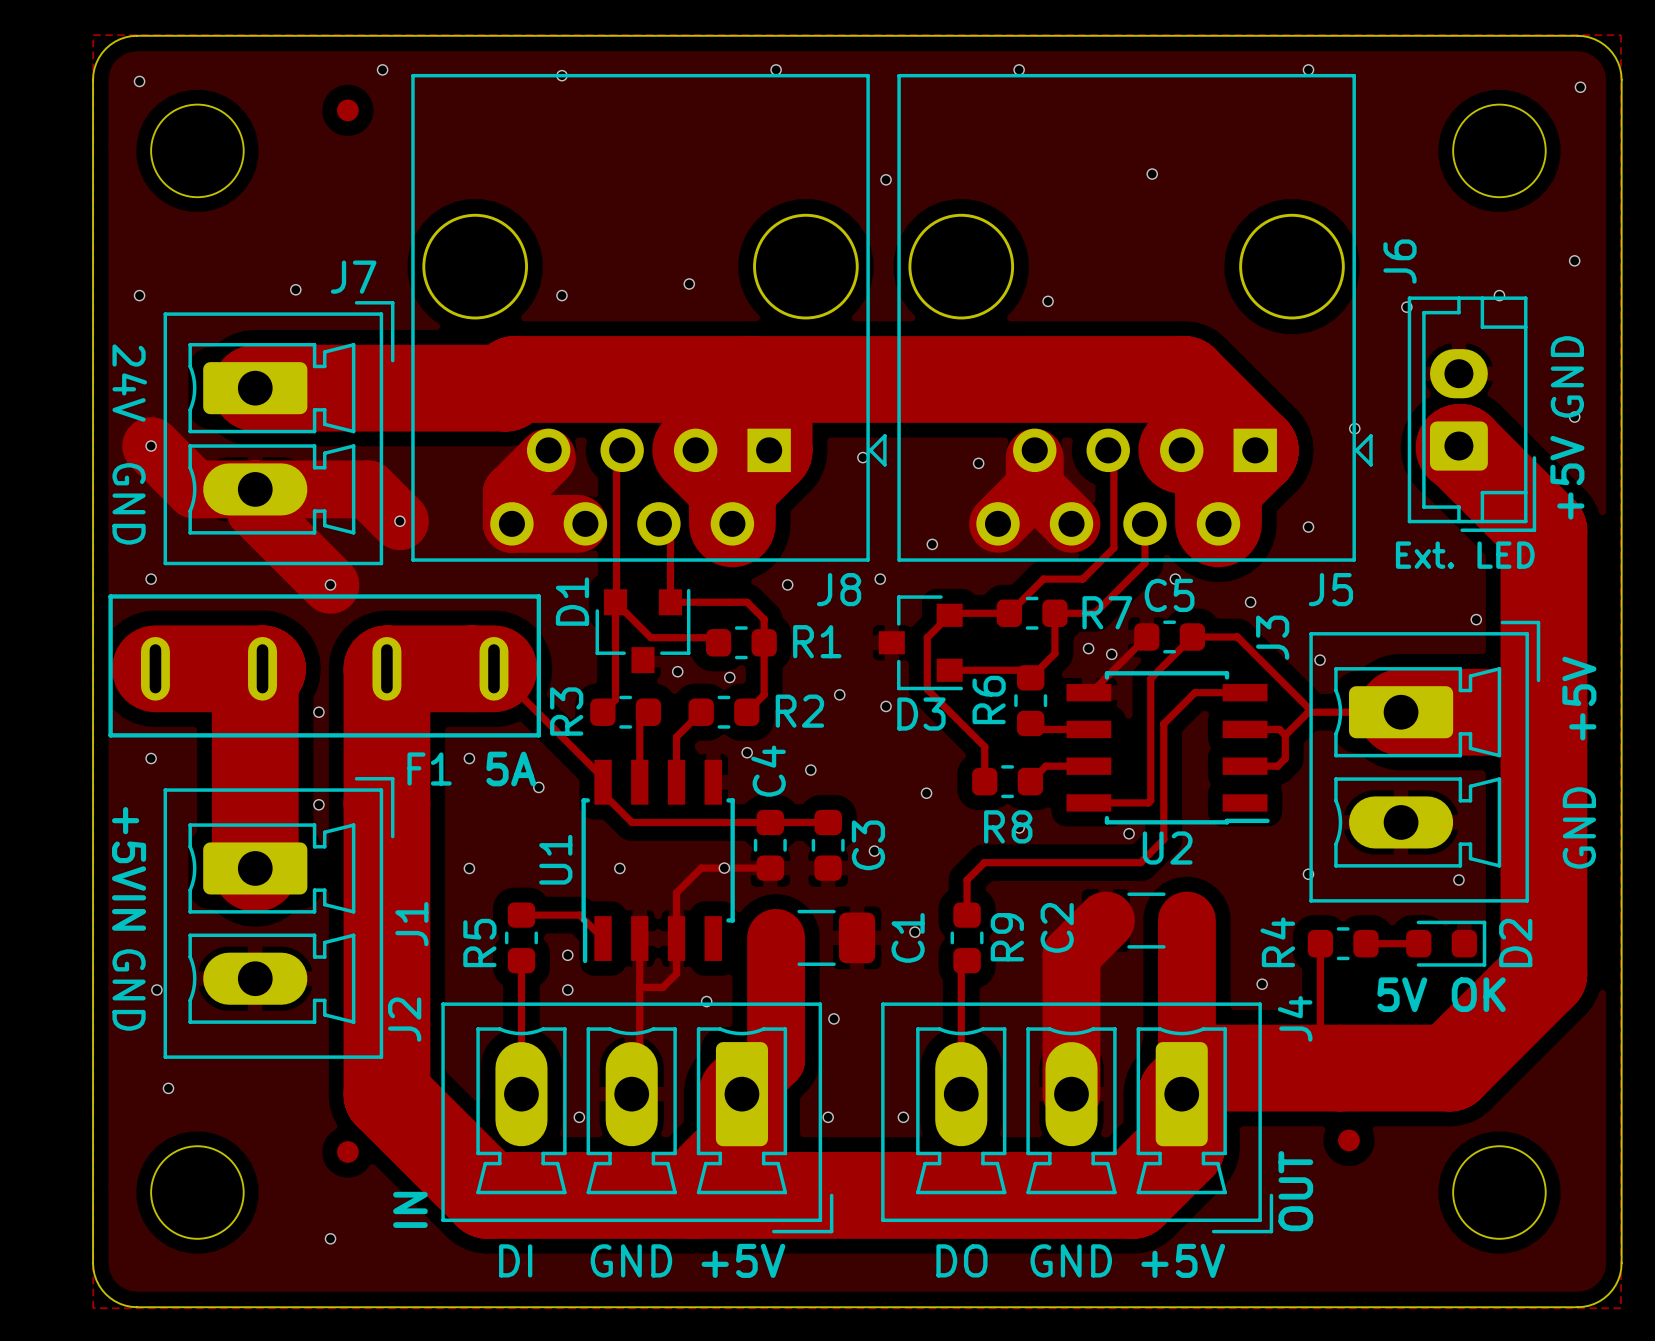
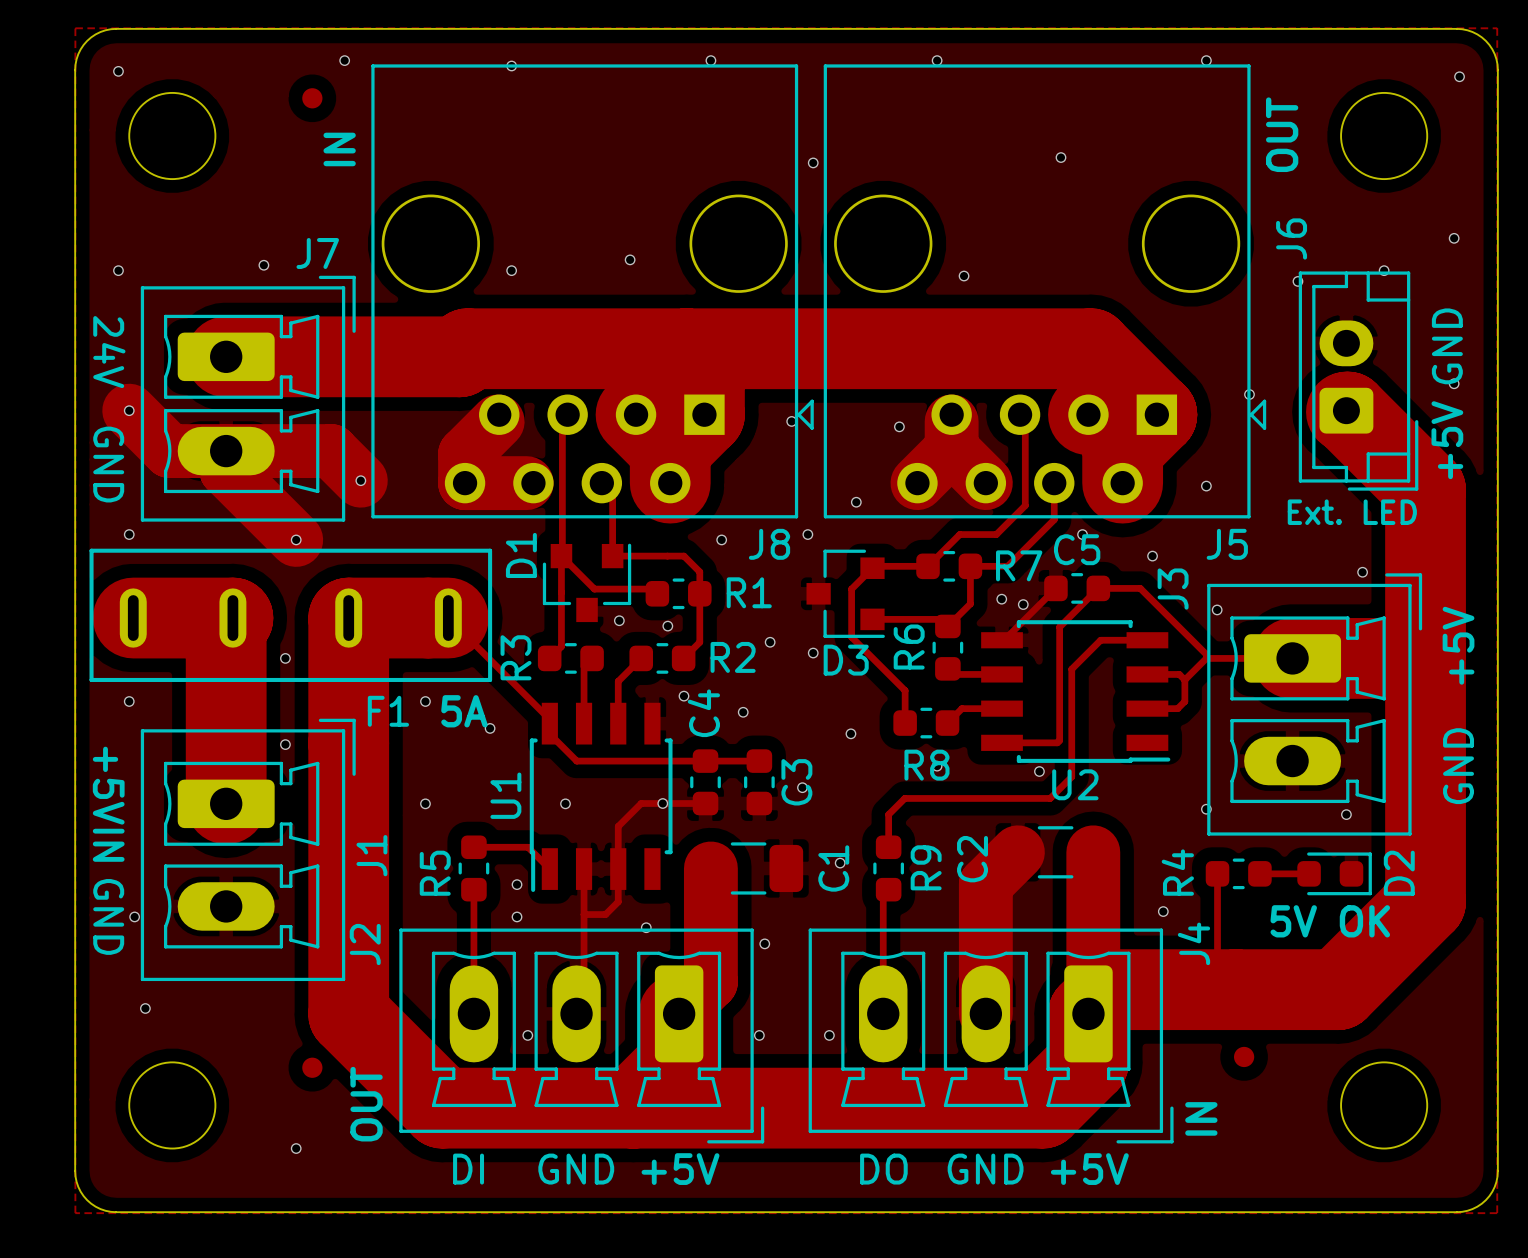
text: none -> OUT (1282, 134)
text: none -> IN (339, 149)
text: OUT (1295, 1191) -> IN (1201, 1118)
text: IN (410, 1209) -> OUT (366, 1104)

